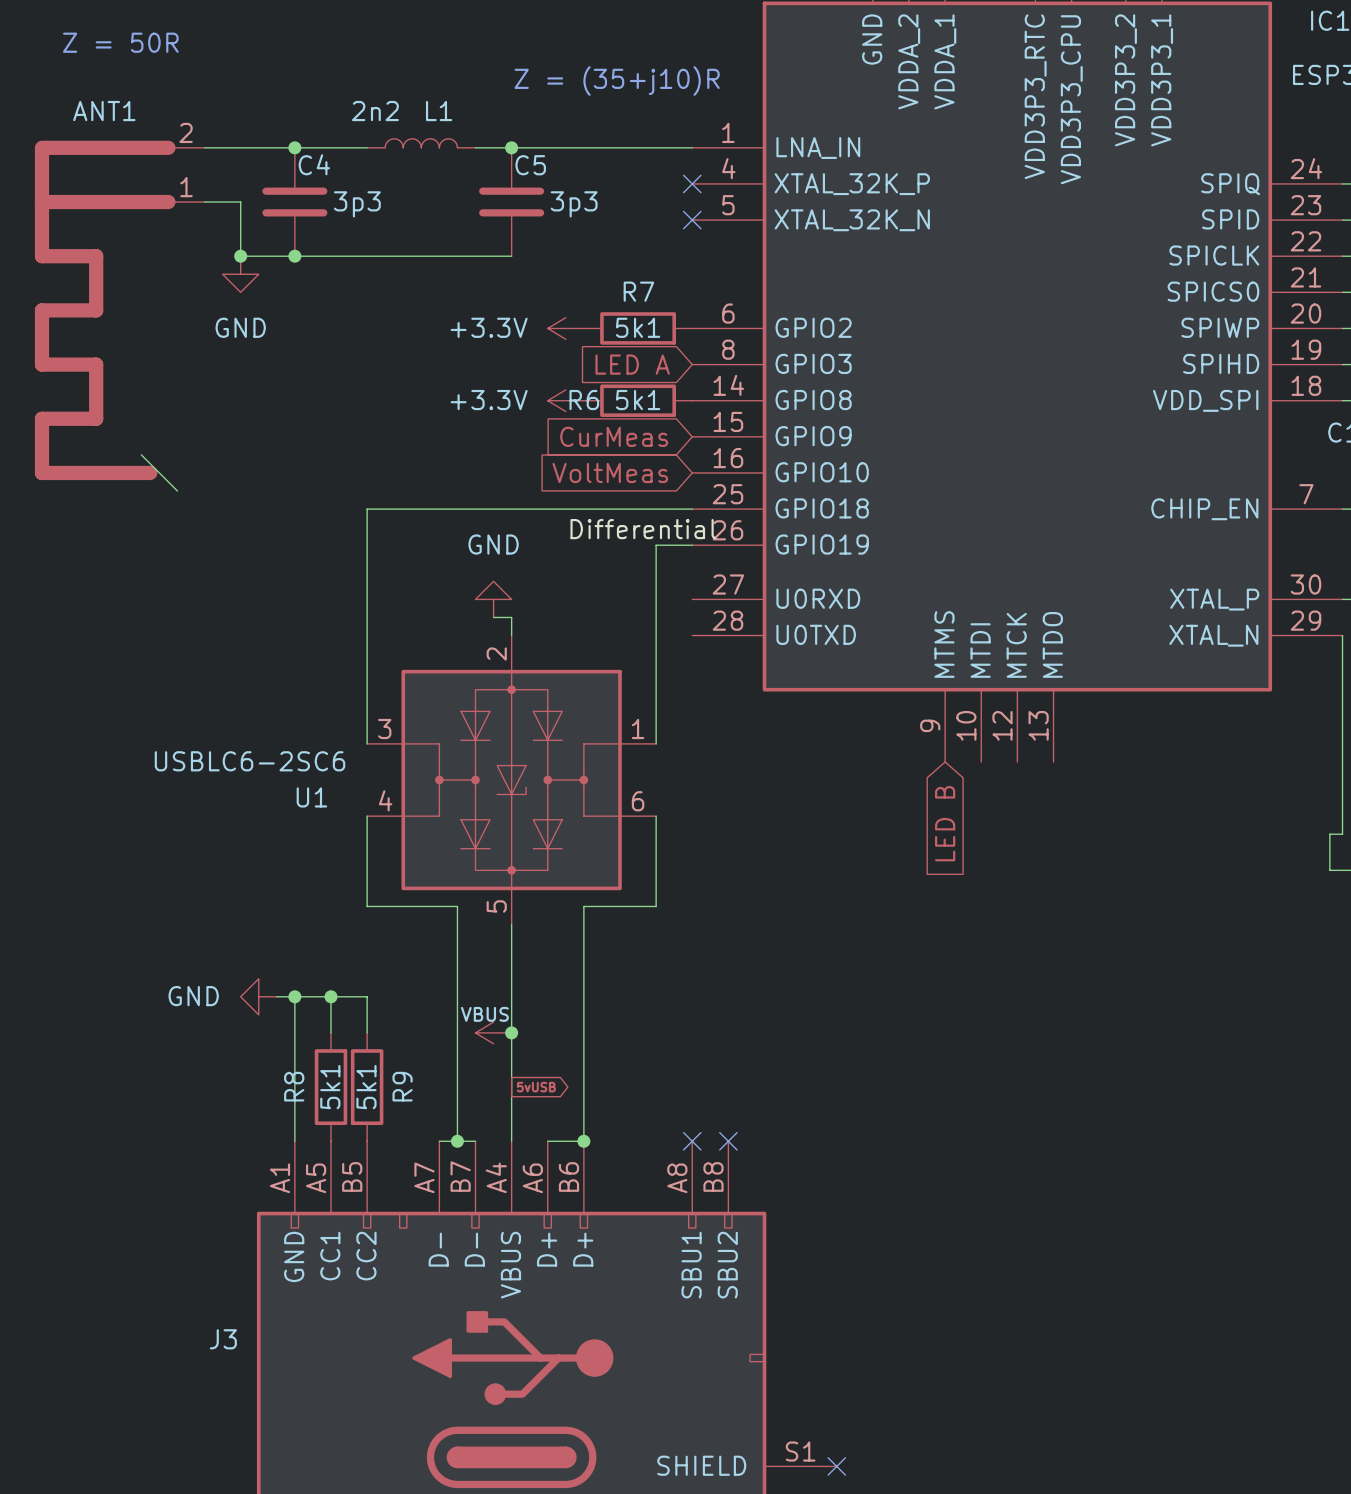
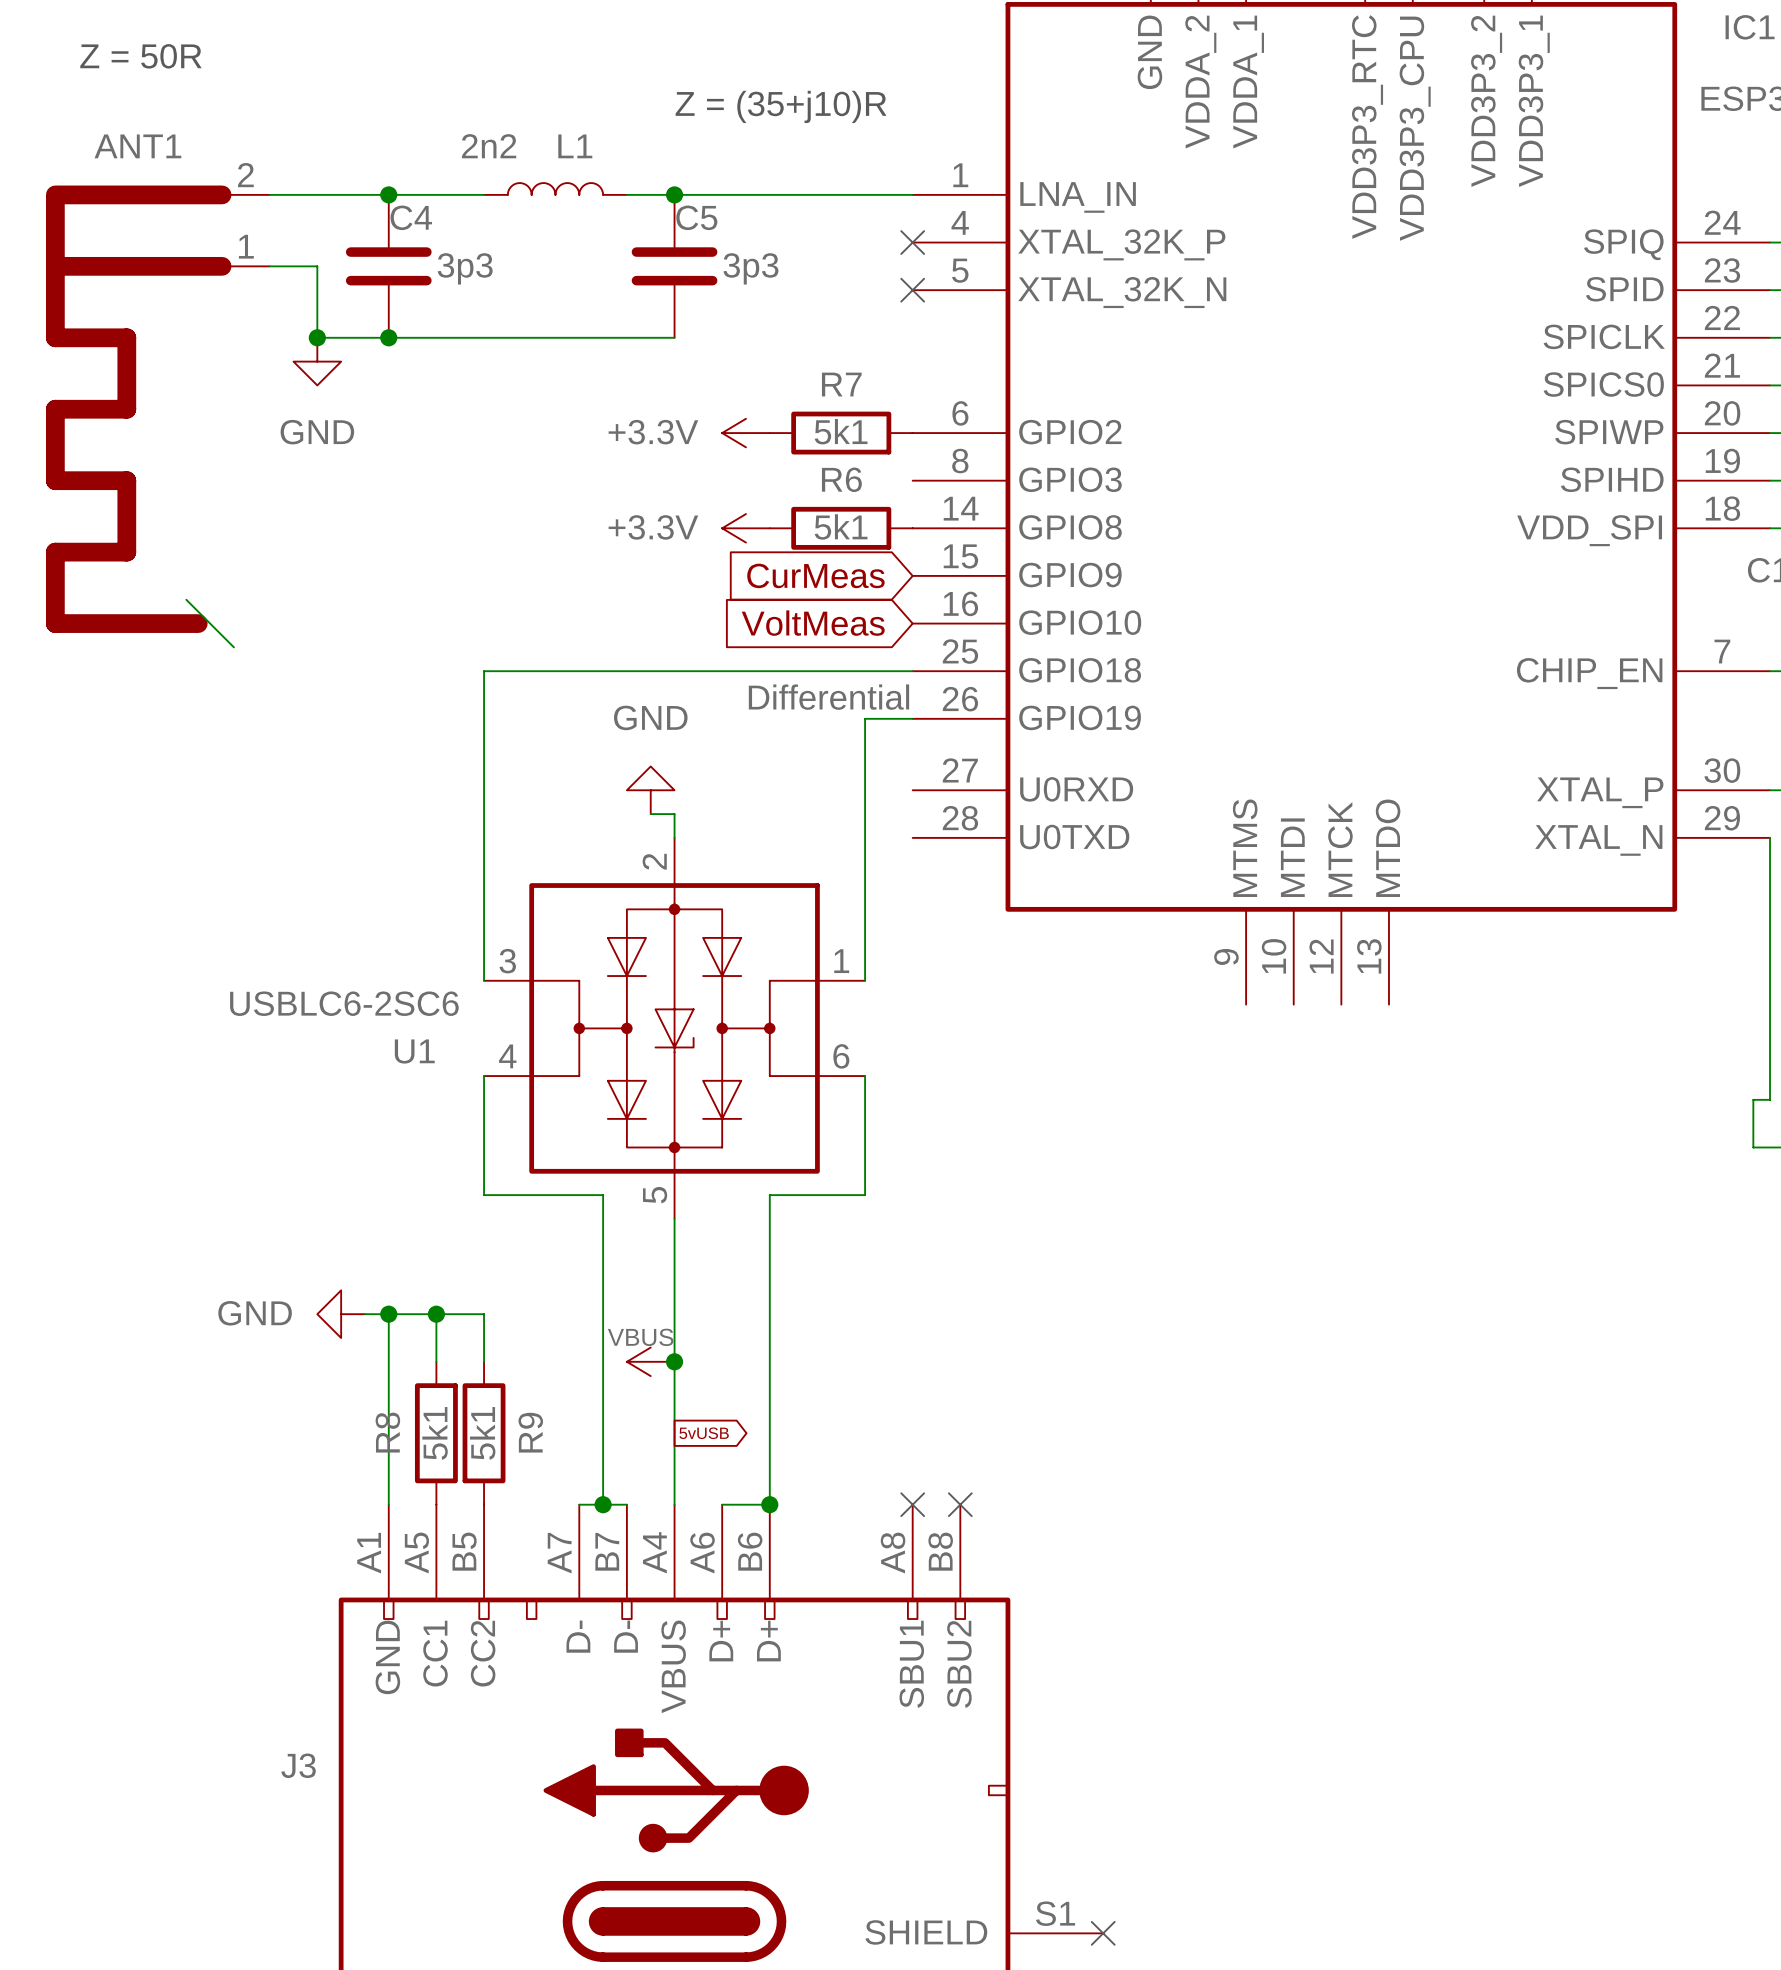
global label: LED A (632, 364) -> none
R6 name position: R6 (584, 400) -> R6 (841, 479)
global label: LED B (945, 823) -> none

